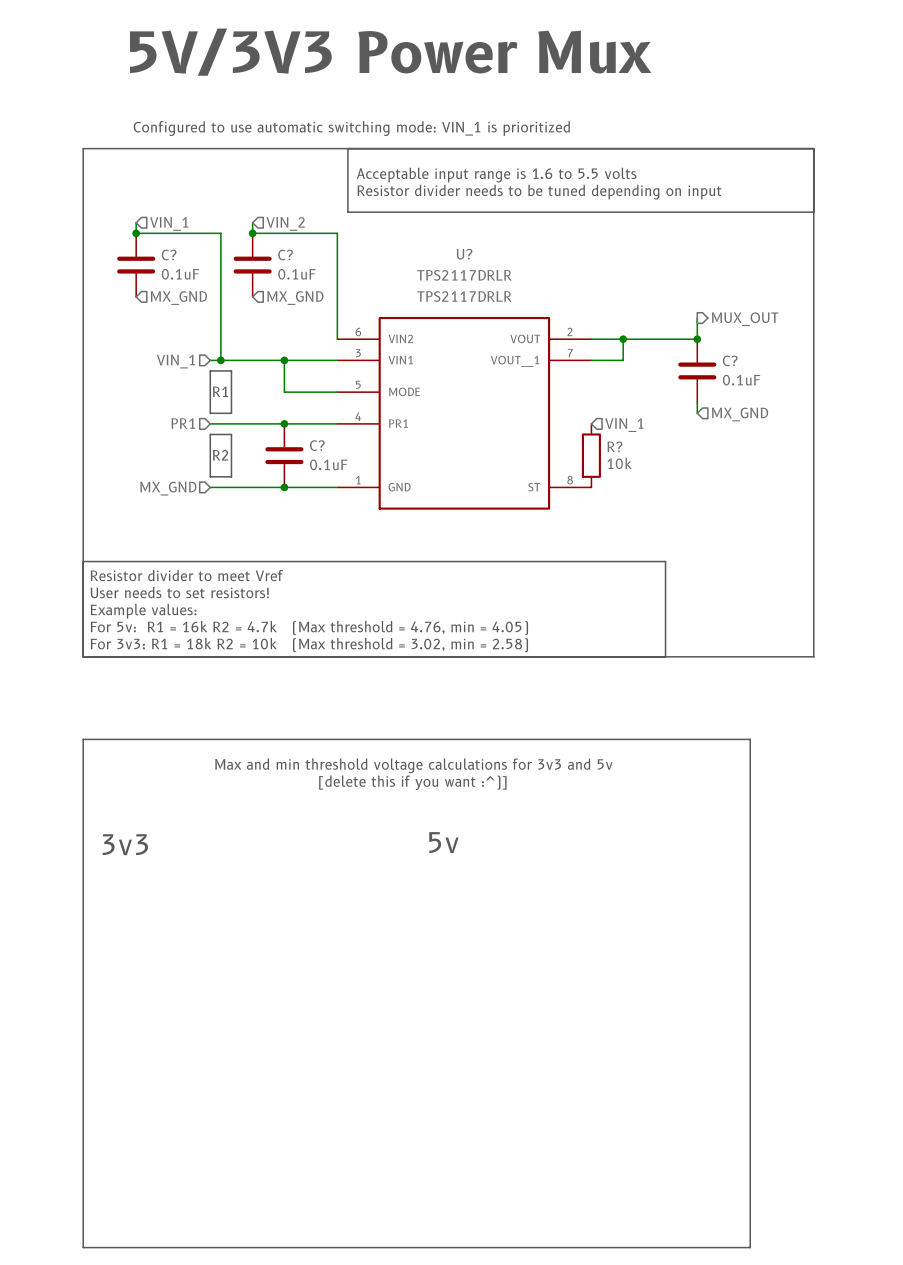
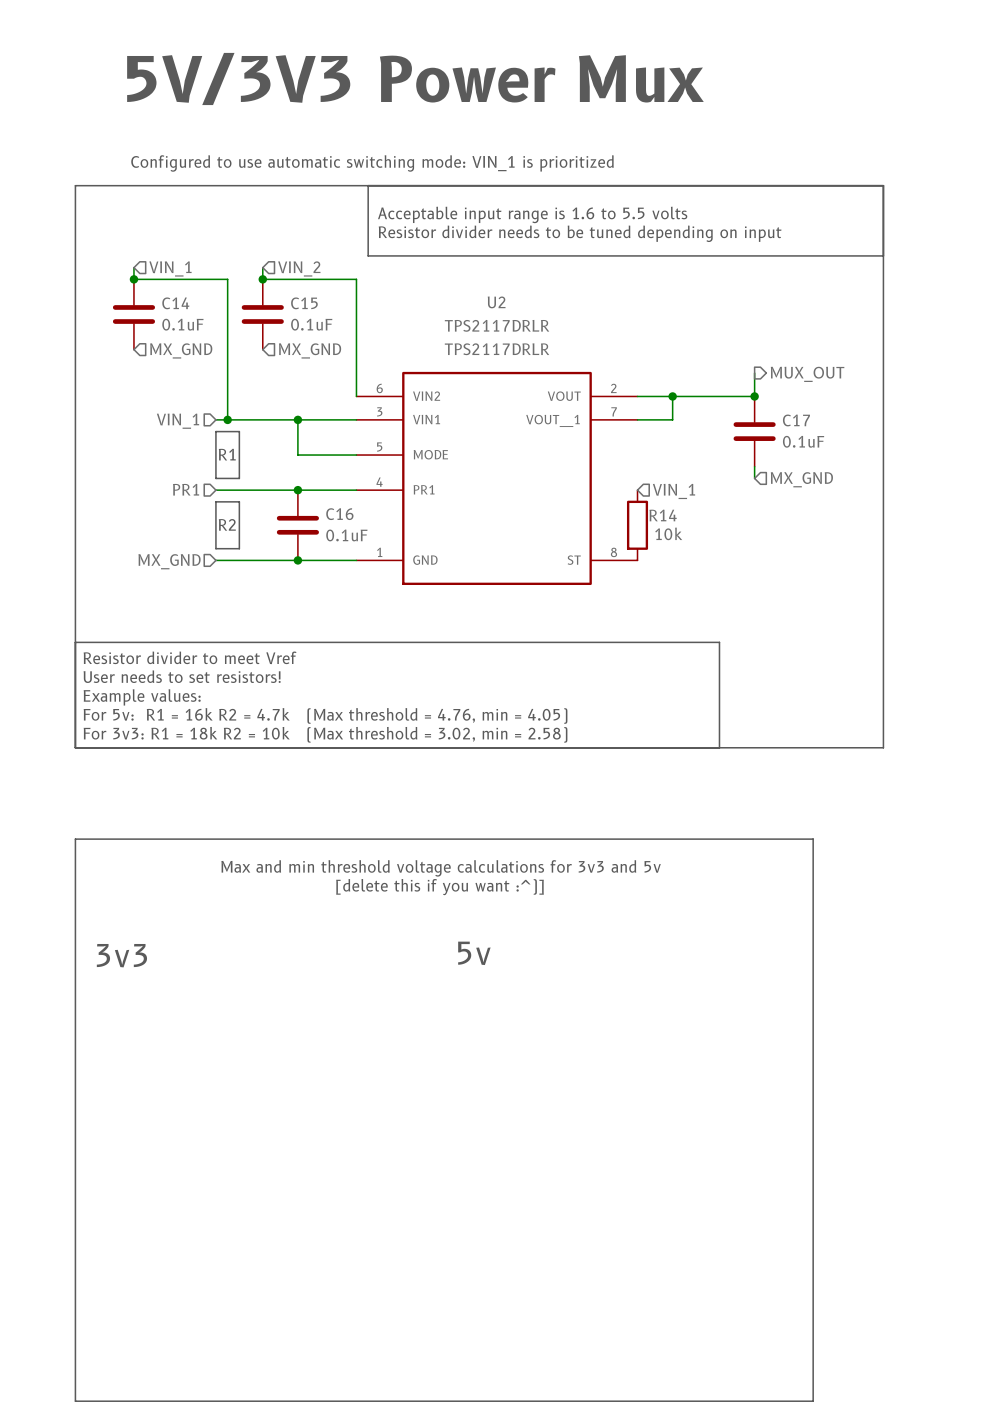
U? name: U? (464, 254) -> U2 (496, 302)
C? name: C? (169, 255) -> C14 (175, 303)
C? name: C? (285, 255) -> C15 (304, 303)
C? name: C? (730, 360) -> C17 (796, 420)
C? name: C? (317, 445) -> C16 (339, 514)
R? name: R? (614, 446) -> R14 (663, 515)

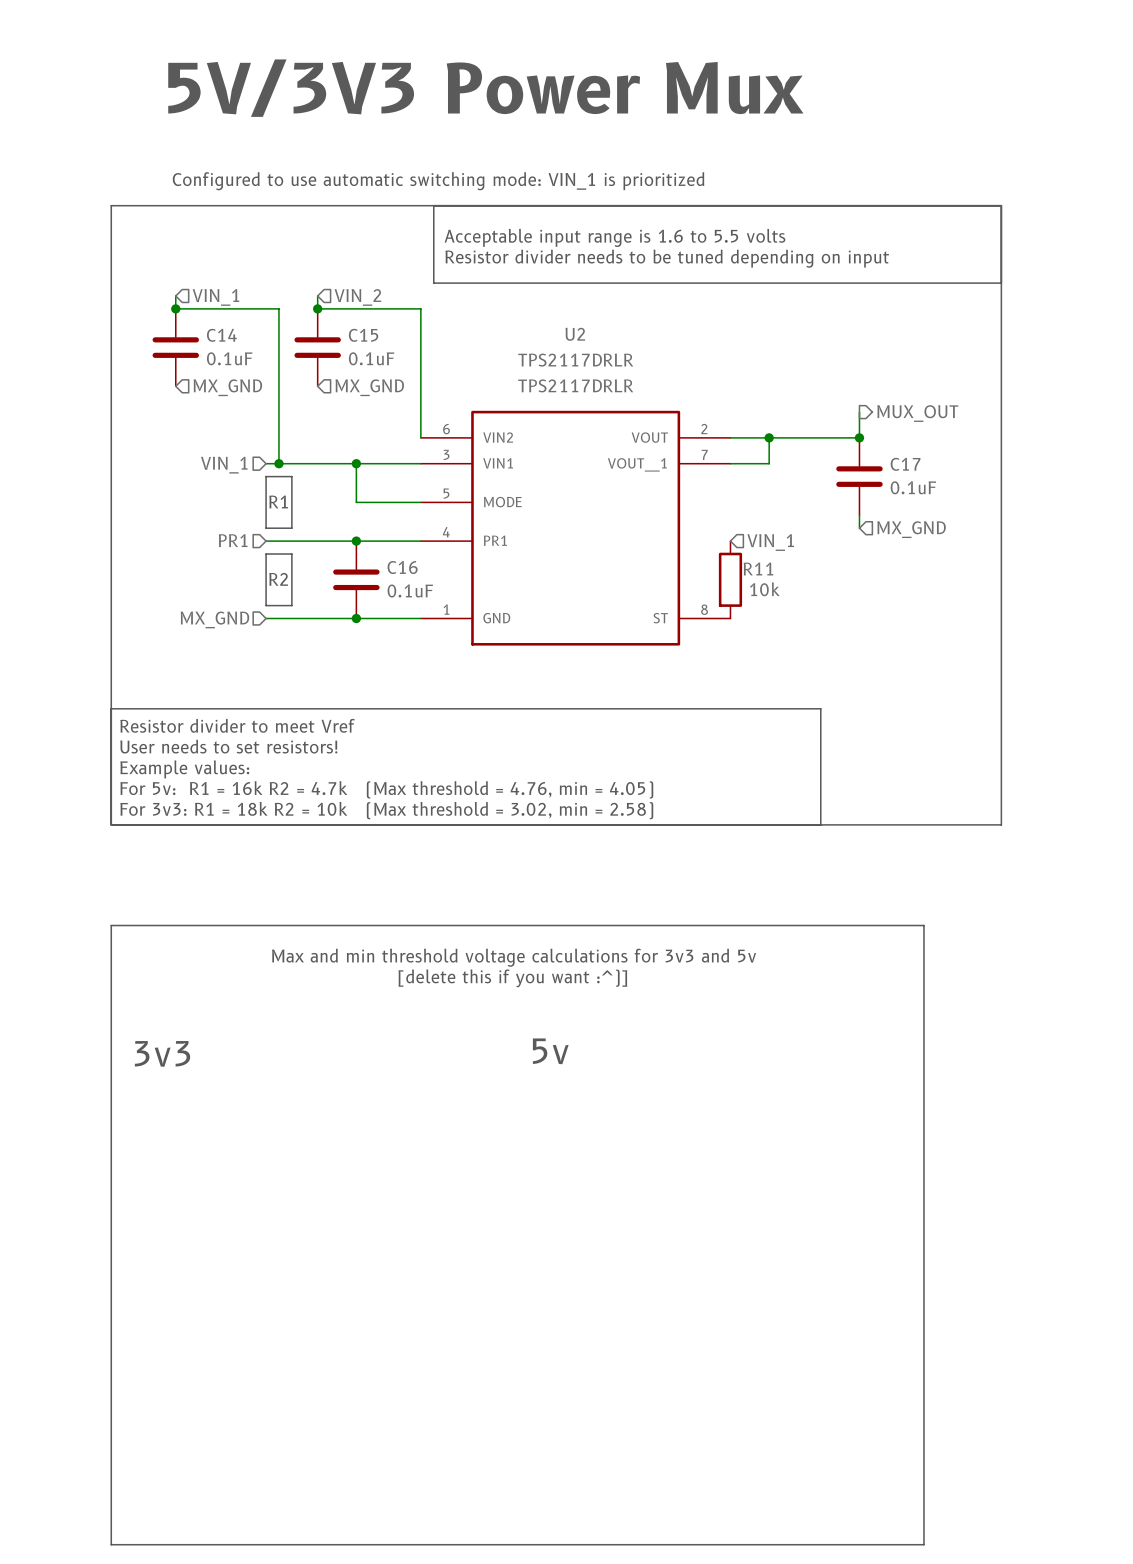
R14 name: R14 (663, 515) -> R11 (758, 569)

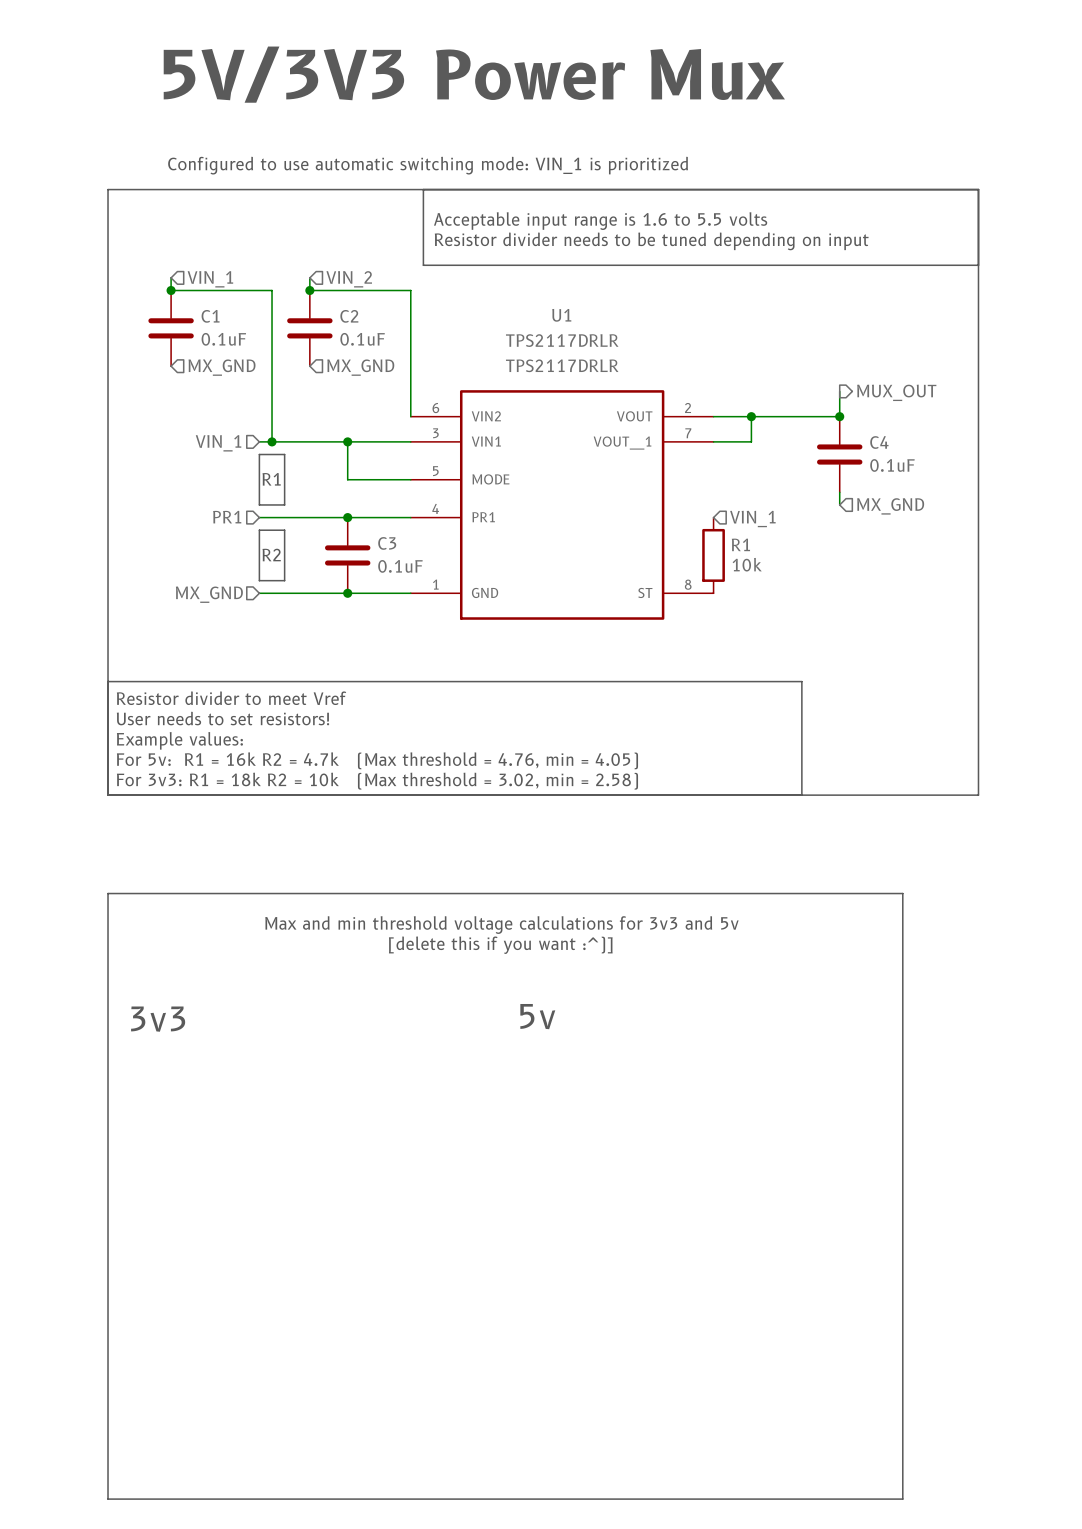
U2 name: U2 (575, 334) -> U1 (561, 315)
C14 name: C14 (221, 335) -> C1 (210, 316)
C15 name: C15 (363, 335) -> C2 (349, 316)
C17 name: C17 (905, 464) -> C4 (879, 442)
C16 name: C16 (402, 567) -> C3 (387, 543)
R11 name: R11 (758, 569) -> R1 (740, 544)

